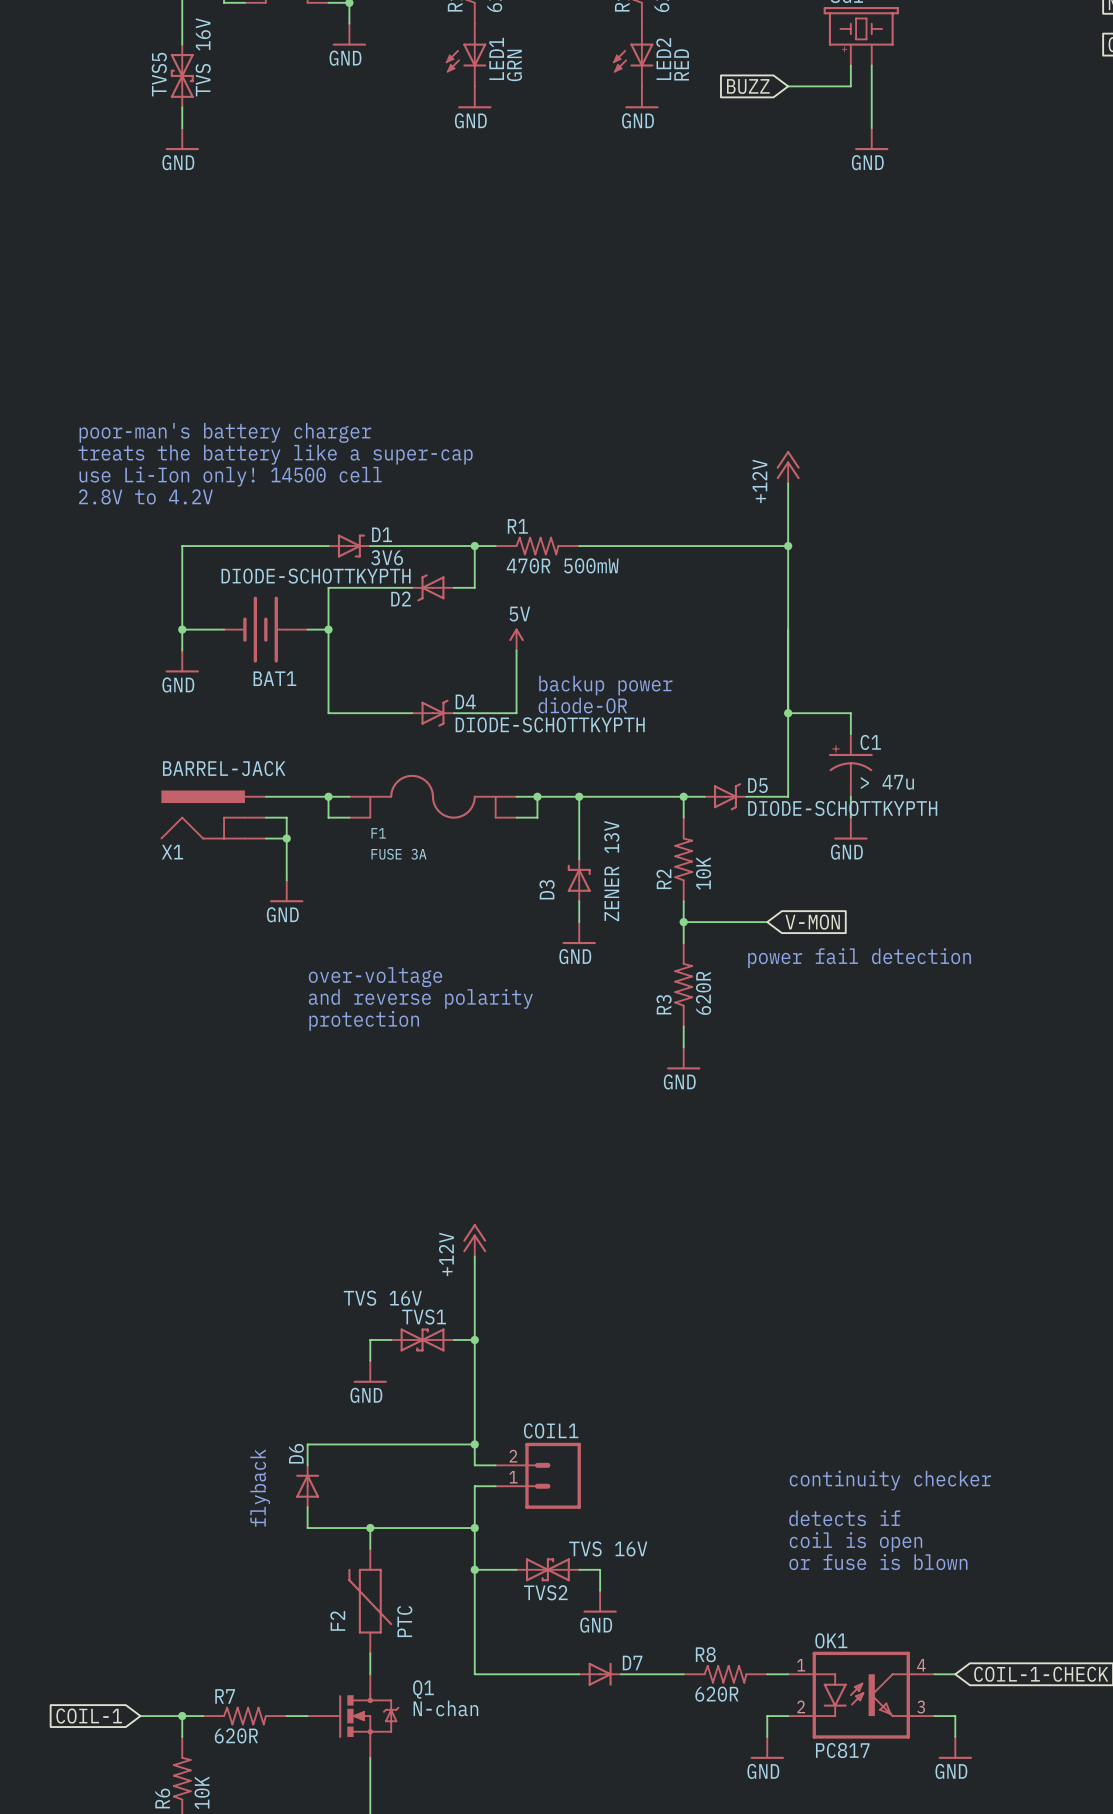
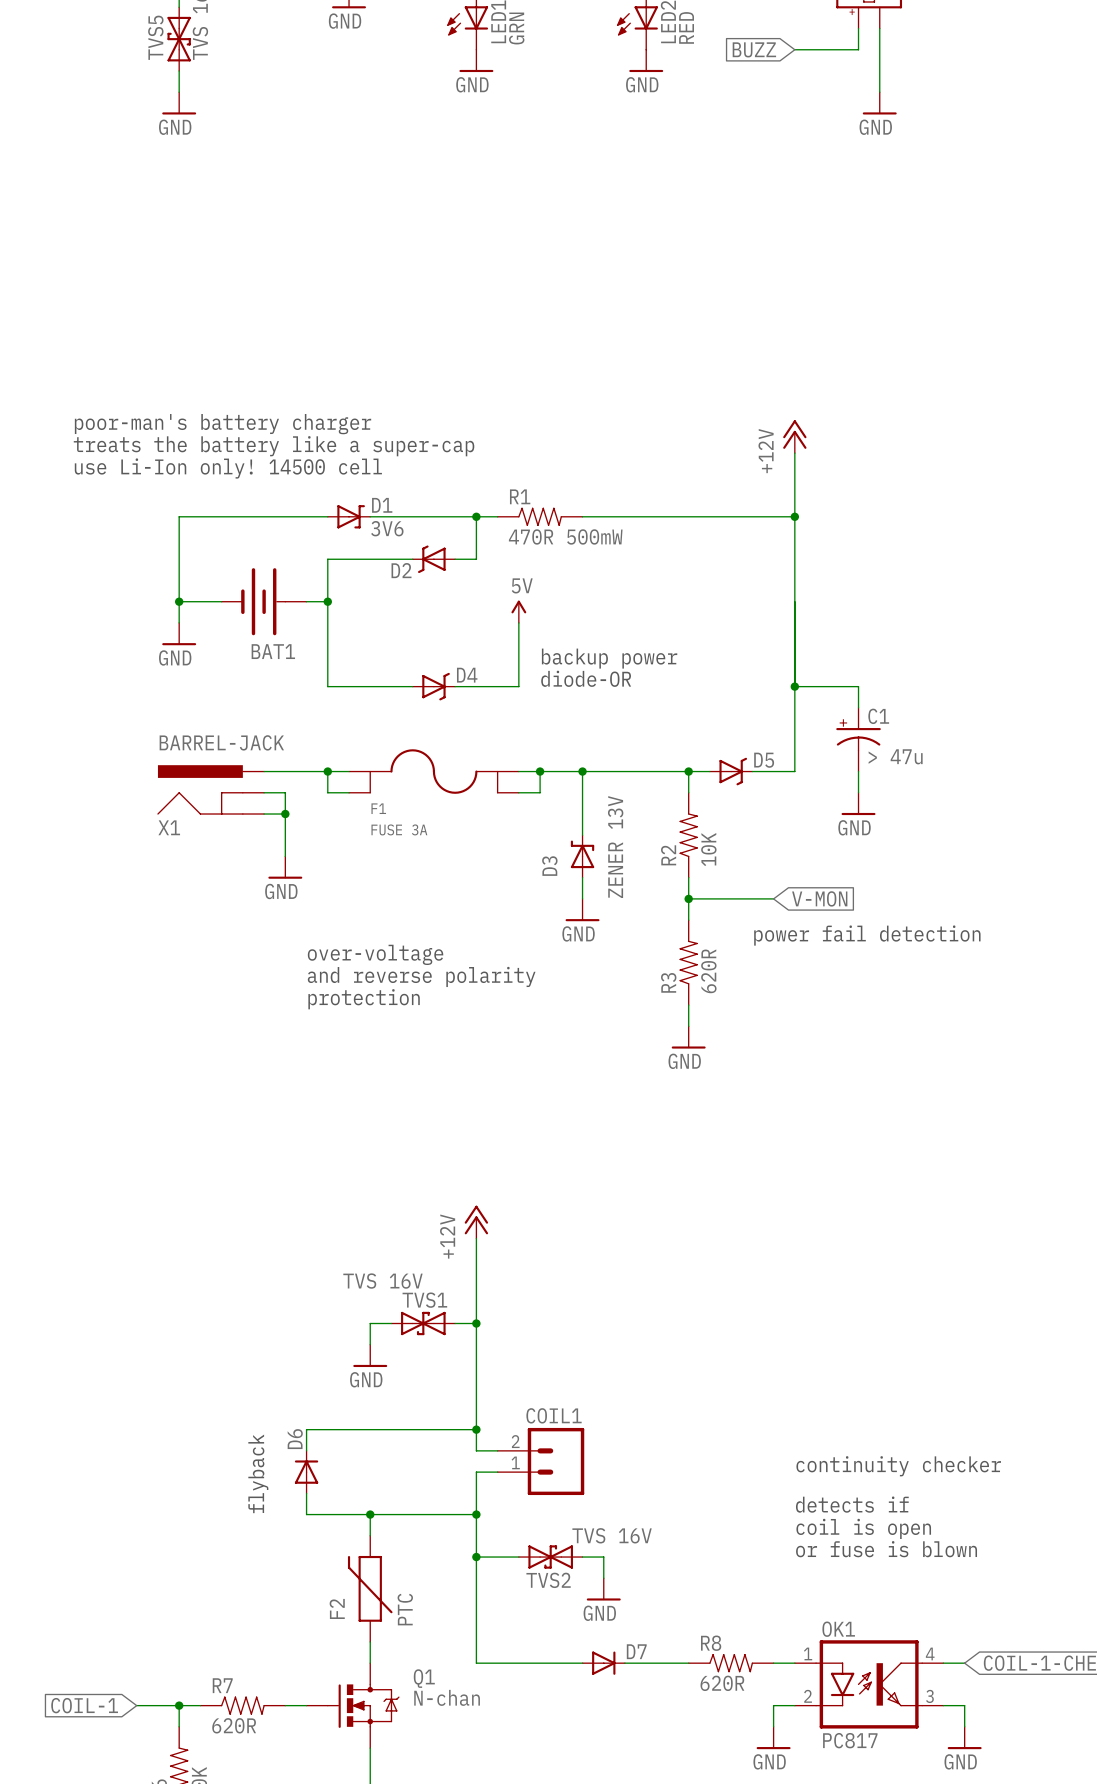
text: poor-man's battery charger (225, 432) -> none
text: treats the battery like a super-cap (275, 454) -> poor-man's battery charger (223, 424)
text: use Li-Ion only! 14500 cell (230, 476) -> treats the battery like a super-cap (274, 446)
text: 2.8V to 4.2V (145, 496) -> use Li-Ion only! 14500 cell (228, 468)
D2 value: DIODE-SCHOTTKYPTH (316, 576) -> none
D4 value: DIODE-SCHOTTKYPTH (550, 724) -> none
D5 value: DIODE-SCHOTTKYPTH (842, 808) -> none

